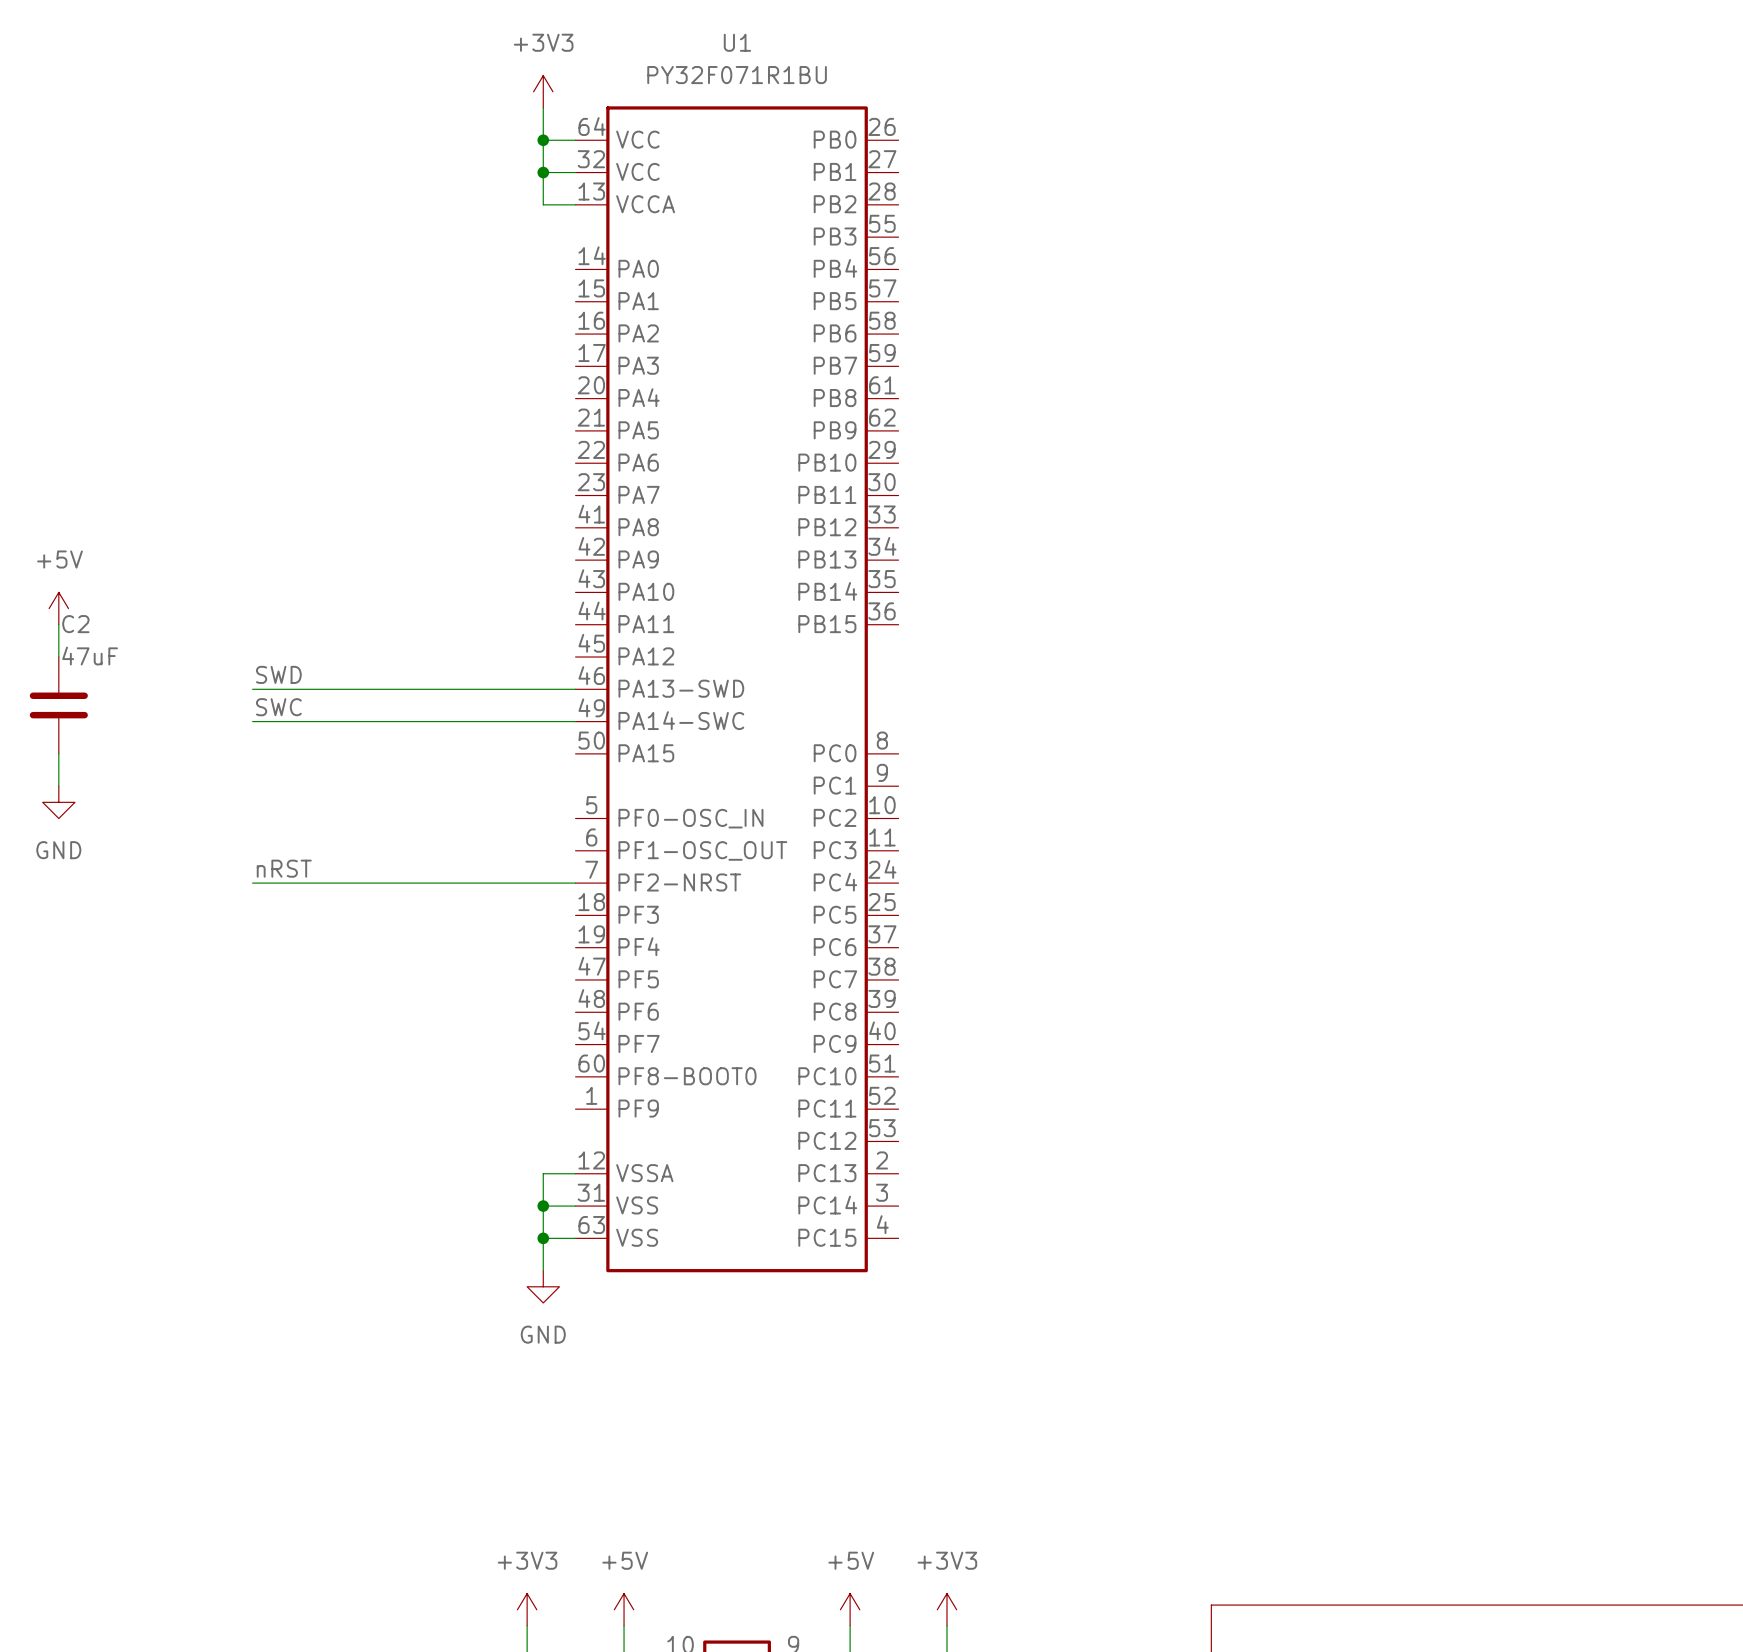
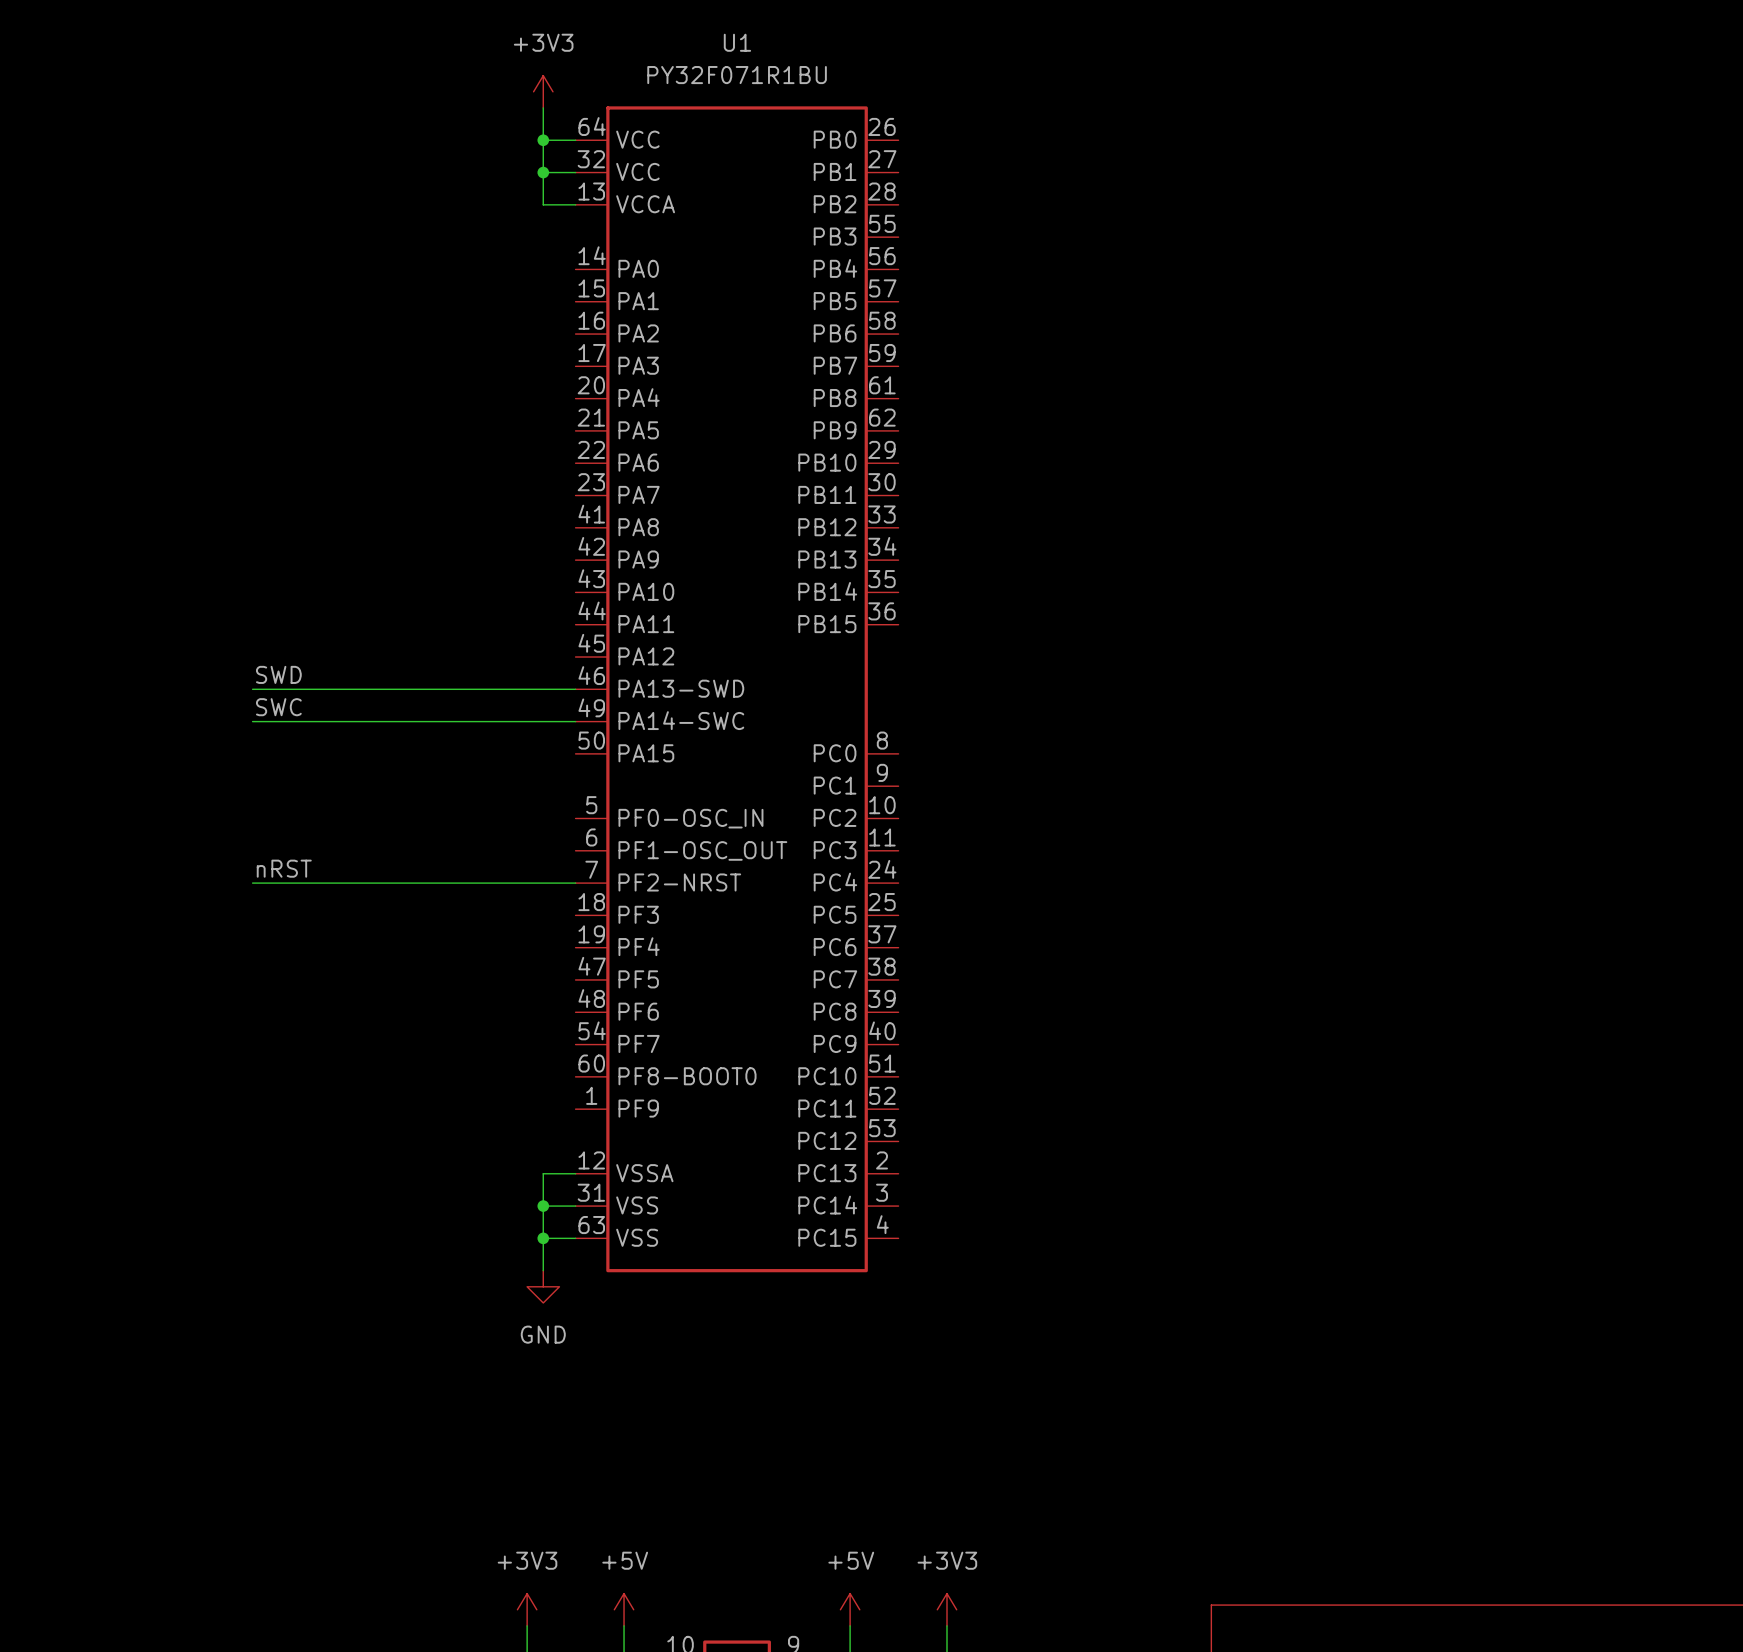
power symbol: +5V (58, 608) -> none
wire: (58, 624) (58, 657) -> none
C2: 47uF (58, 705) -> none
wire: (58, 753) (58, 786) -> none
power symbol: GND (58, 802) -> none

